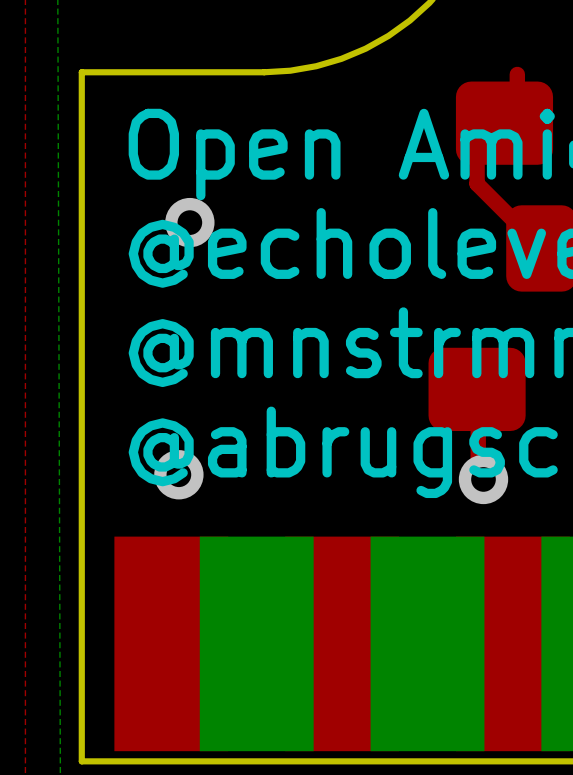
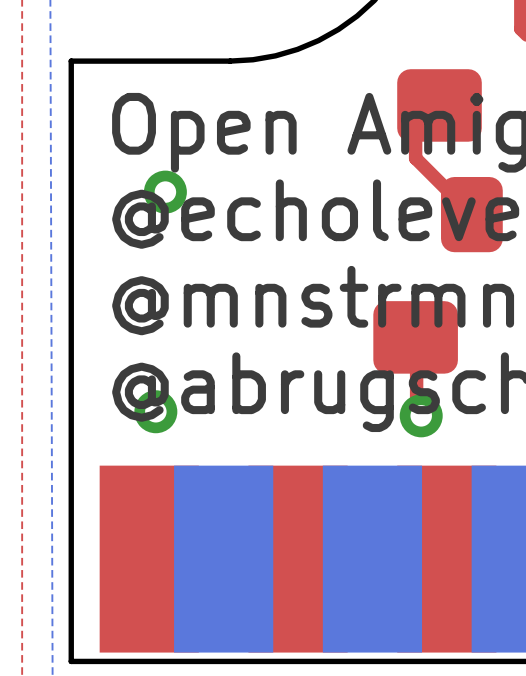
top track: (517, 74) (517, 93) -> none

